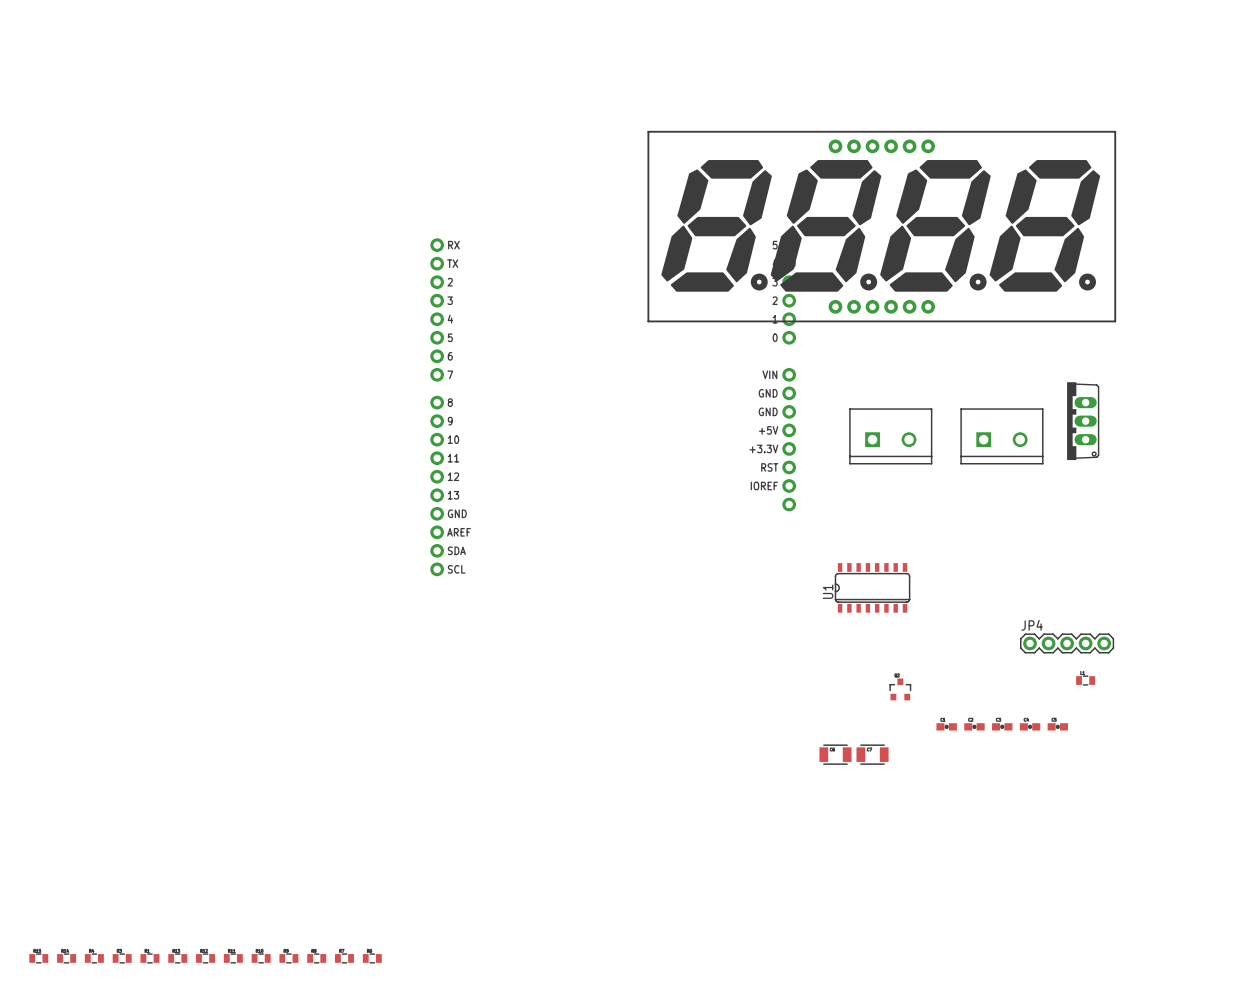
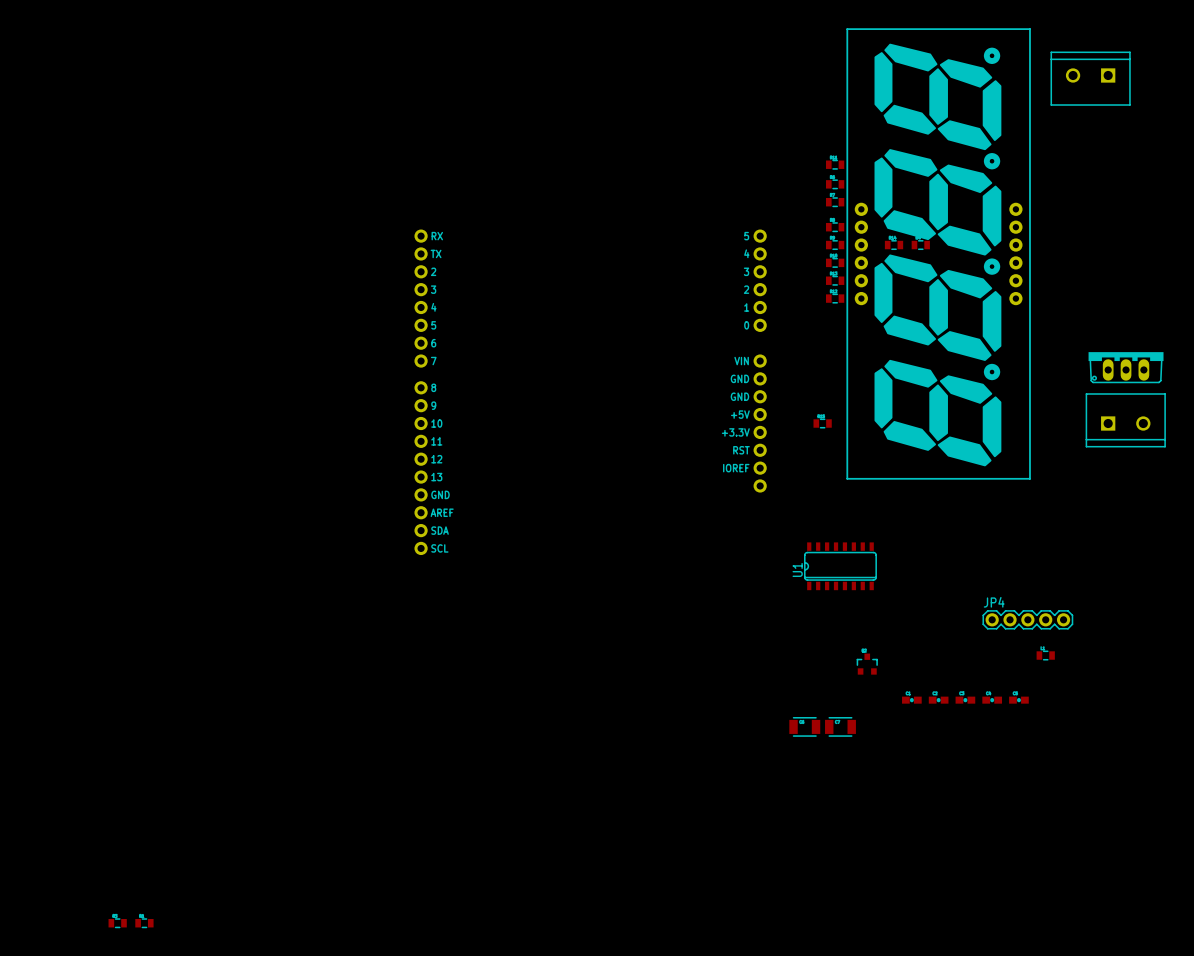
part: none -> (1090, 78)
part rotation: 0° (881, 226) -> 90° counterclockwise (938, 253)
part rotation: 0° (1083, 421) -> 90° clockwise (1126, 367)
part position: (1083, 421) -> (1126, 367)
part: (890, 436) -> none
part: (1001, 436) -> none
part: none -> (1125, 420)
part position: (38, 958) -> (822, 423)
part position: (66, 958) -> (894, 245)
part position: (94, 958) -> (920, 245)
part position: (177, 958) -> (835, 280)
part position: (205, 958) -> (835, 298)
part position: (233, 958) -> (835, 164)
part position: (261, 958) -> (835, 262)
part position: (288, 958) -> (835, 245)
part position: (316, 958) -> (835, 227)
part position: (344, 958) -> (835, 202)
part position: (372, 958) -> (835, 184)

